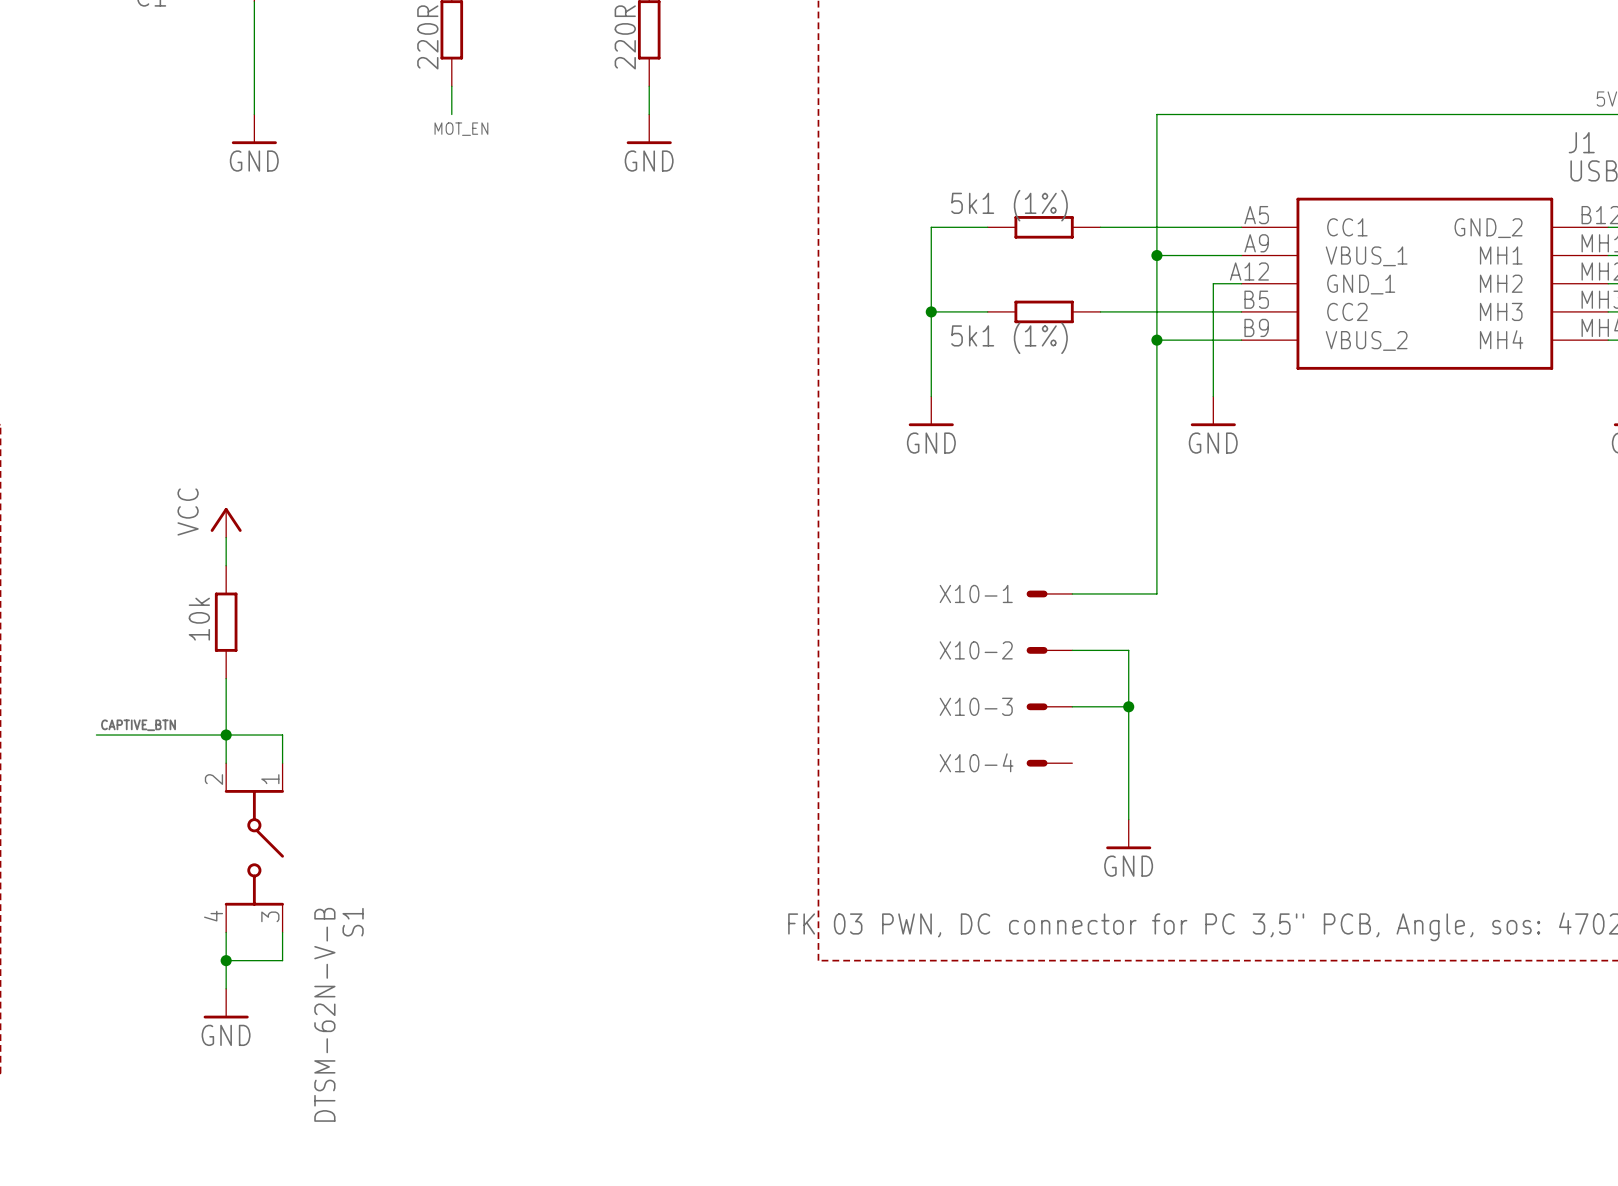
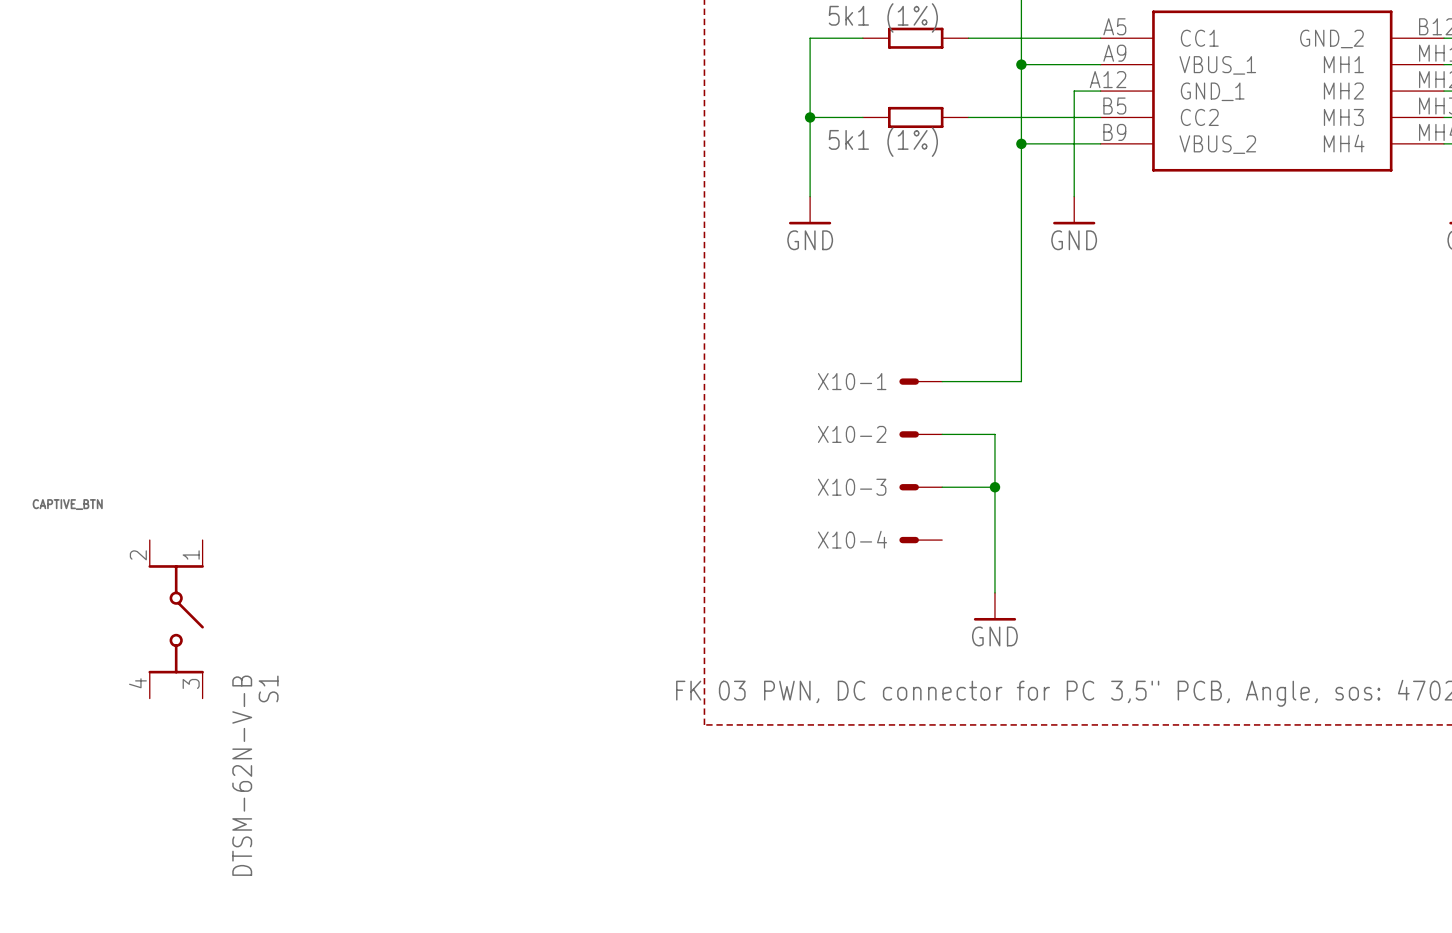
power symbol: VCC (226, 522) -> none
wire: (226, 537) (226, 565) -> none
part: 10k (226, 622) -> none
wire: (226, 678) (226, 763) -> none
wire: (96, 735) (282, 735) (282, 763) -> none
junction: (226, 735) -> none
wire: (226, 932) (226, 988) -> none
wire: (282, 932) (282, 960) (226, 960) -> none
junction: (226, 960) -> none
power symbol: GND (226, 1003) -> none

